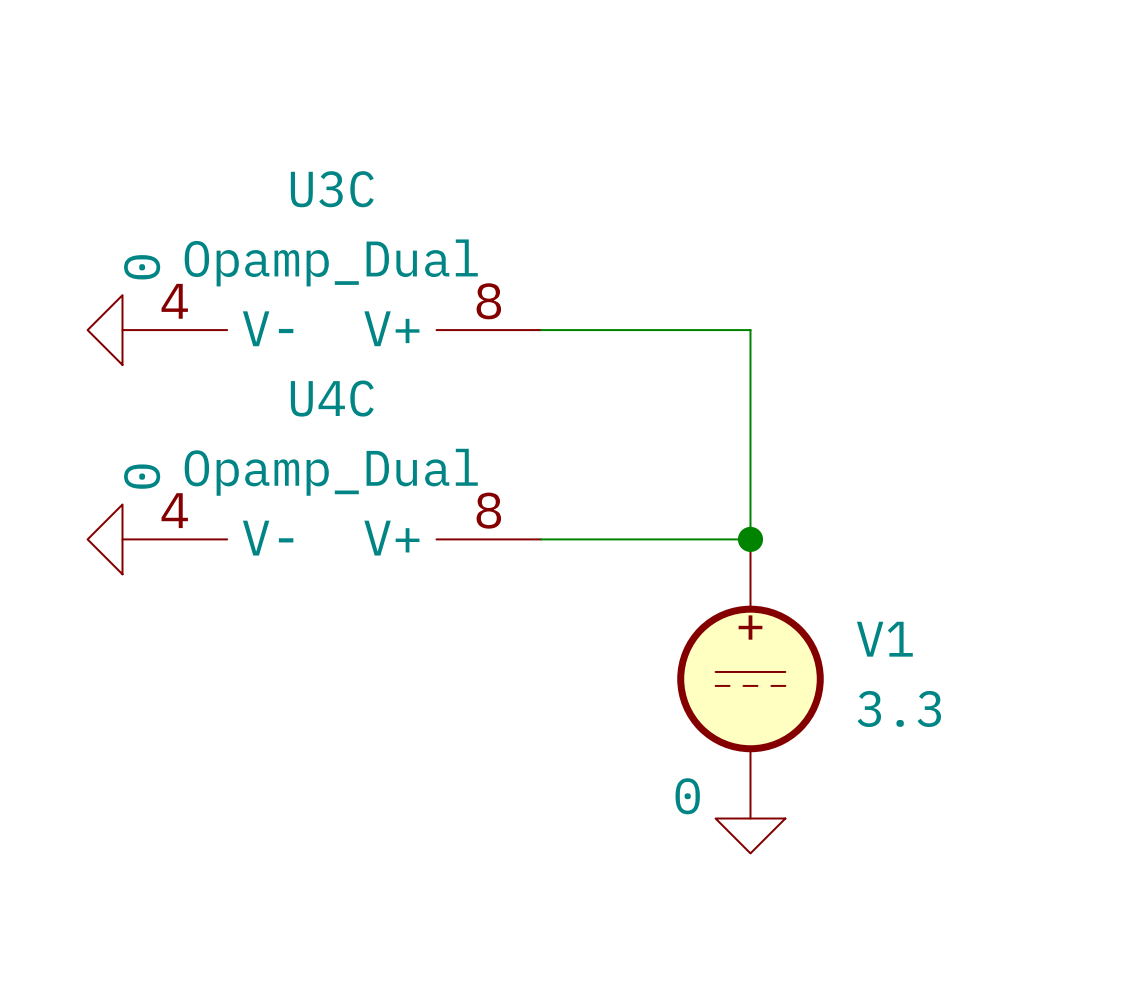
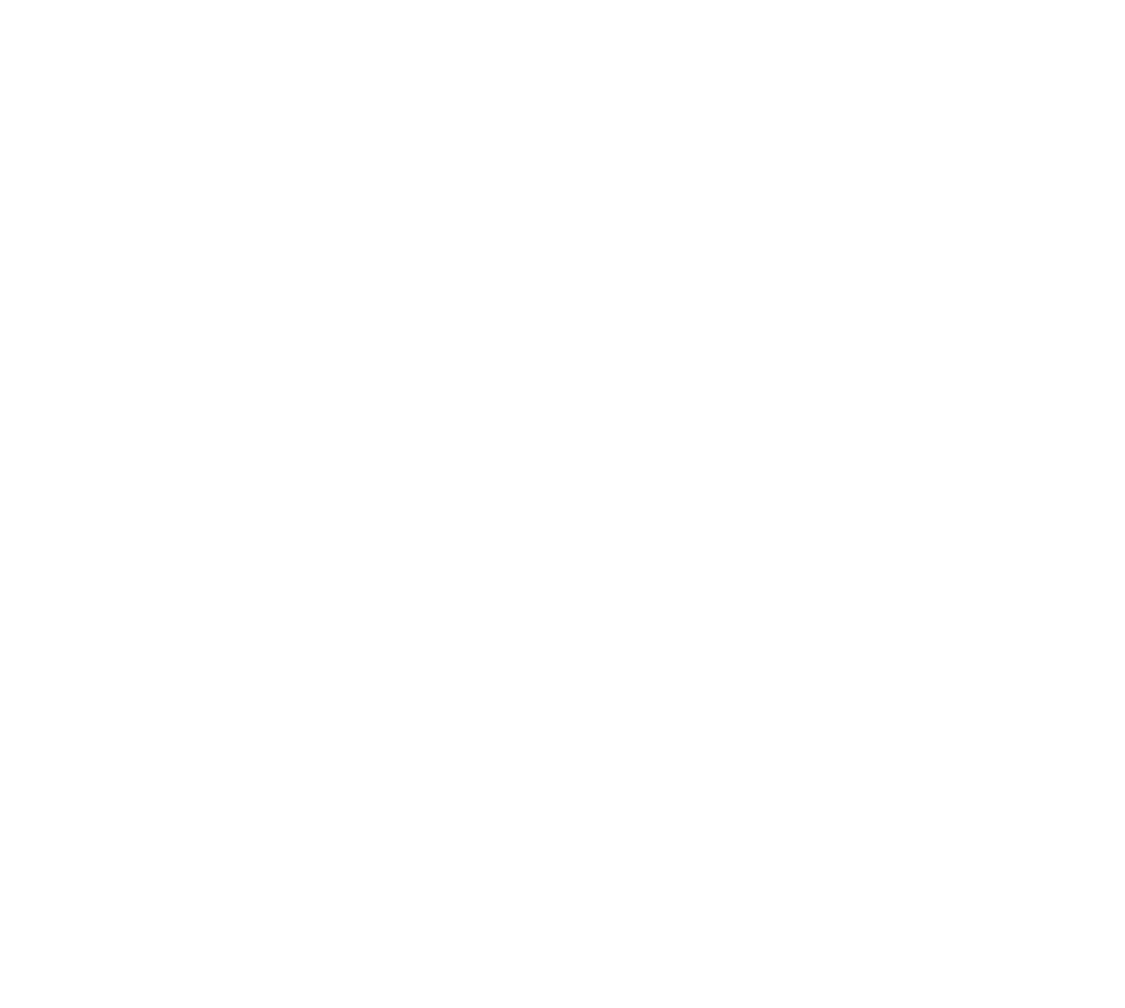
power symbol: 0 (105, 330) -> none
U3C: Opamp_Dual (331, 330) -> none
wire: (541, 330) (750, 330) (750, 539) (541, 539) -> none
power symbol: 0 (105, 539) -> none
U4C: Opamp_Dual (331, 539) -> none
junction: (750, 539) -> none
V1: 3.3 (750, 678) -> none
power symbol: 0 (750, 835) -> none

